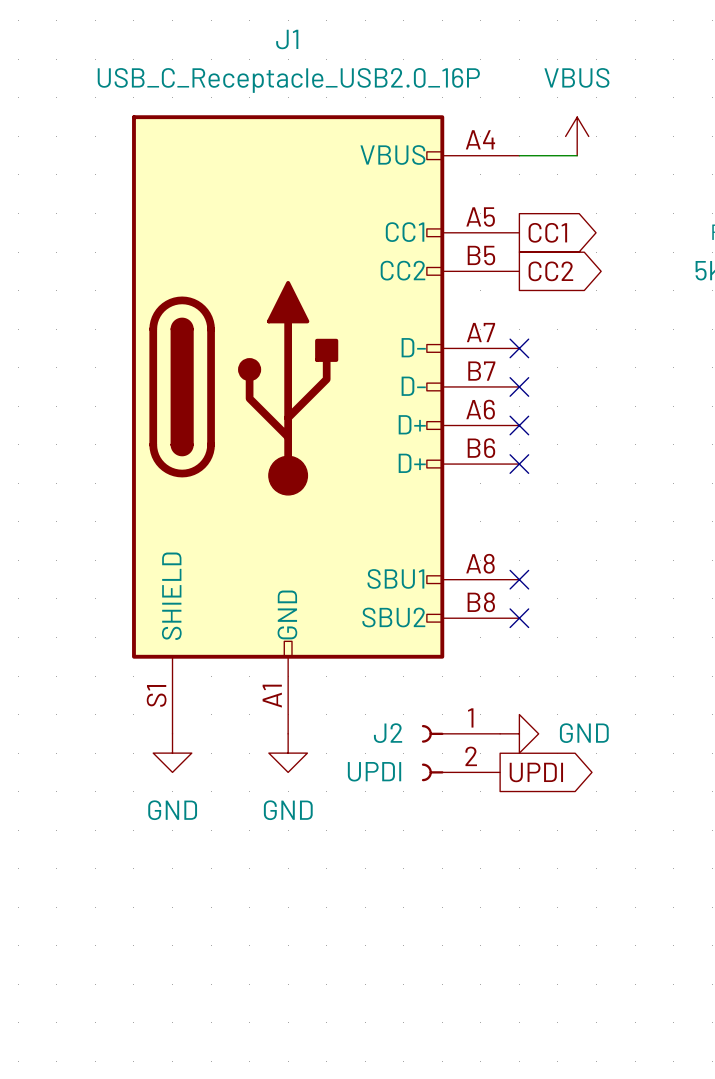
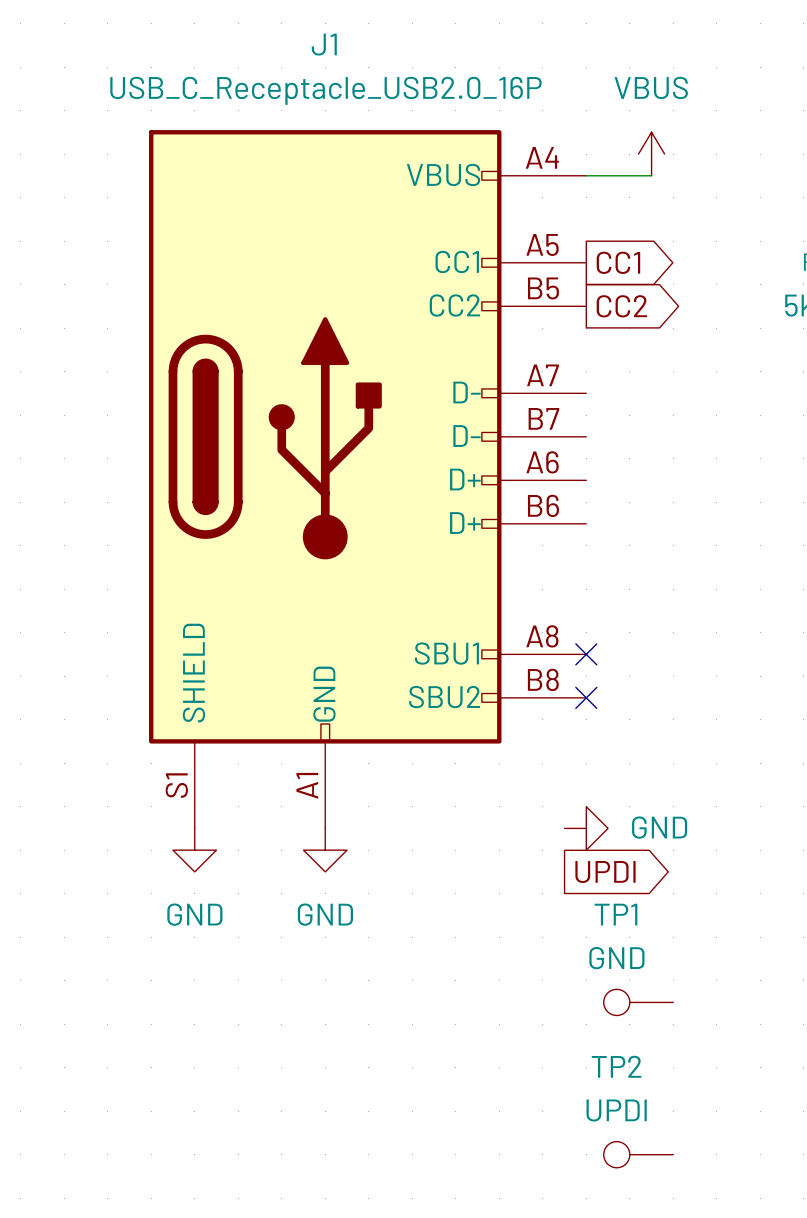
no-connect mark: (519, 348) -> none
no-connect mark: (519, 386) -> none
no-connect mark: (519, 425) -> none
no-connect mark: (519, 464) -> none
J2: UPDI (461, 753) -> none
TP1: none -> GND (638, 1002)
TP2: none -> UPDI (638, 1154)

